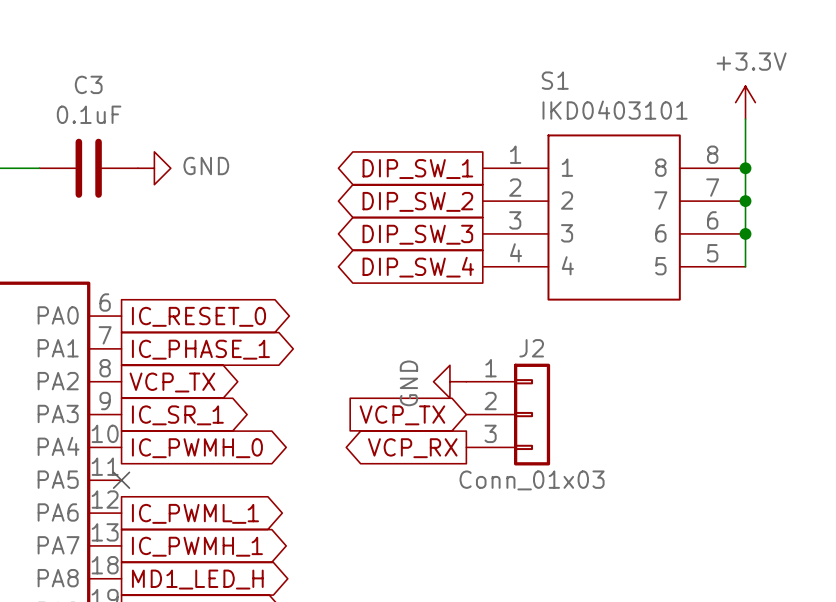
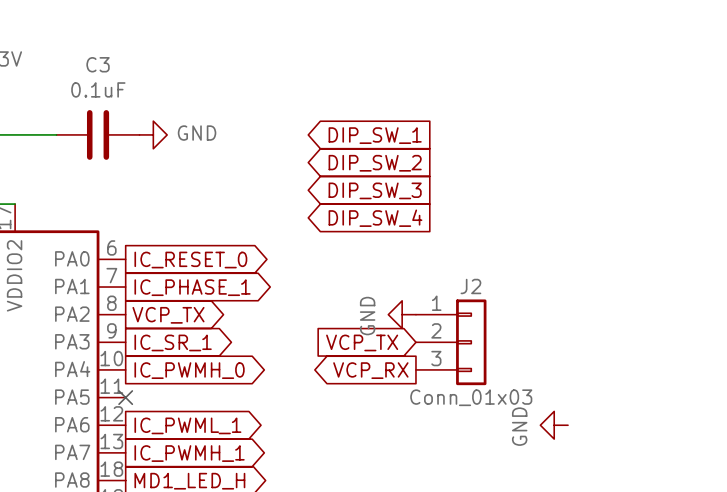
power symbol: +3.3V (745, 102) -> none
wire: (745, 119) (745, 266) -> none
junction: (745, 168) -> none
junction: (745, 201) -> none
S1: IKD0403101 (614, 217) -> none
junction: (745, 233) -> none
power symbol: none -> GND (554, 425)

